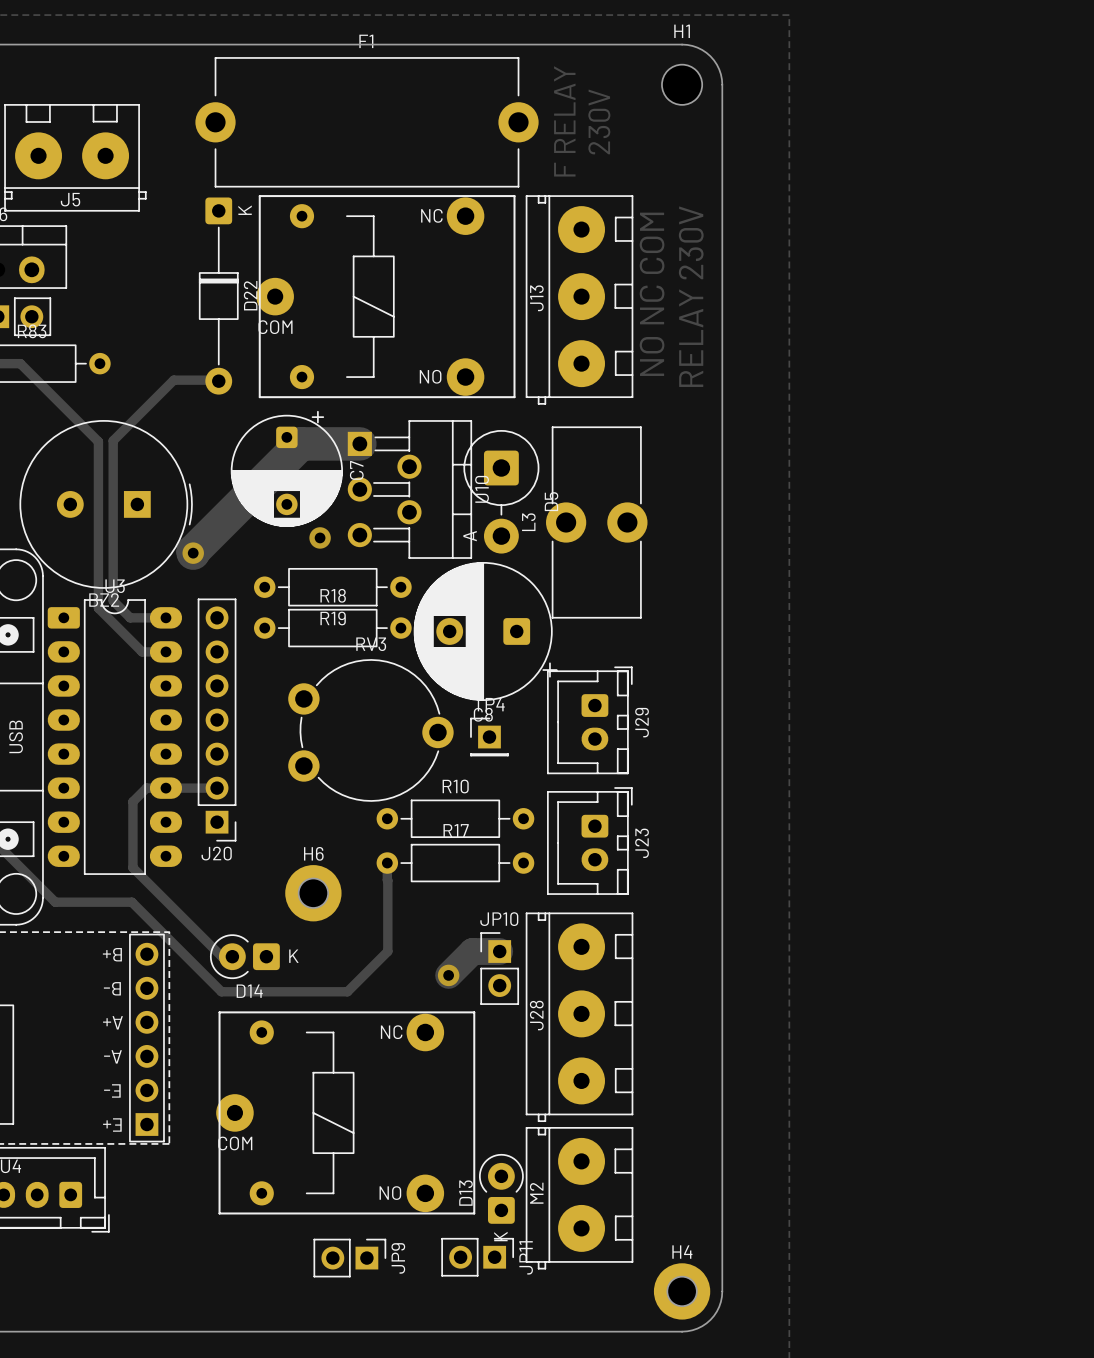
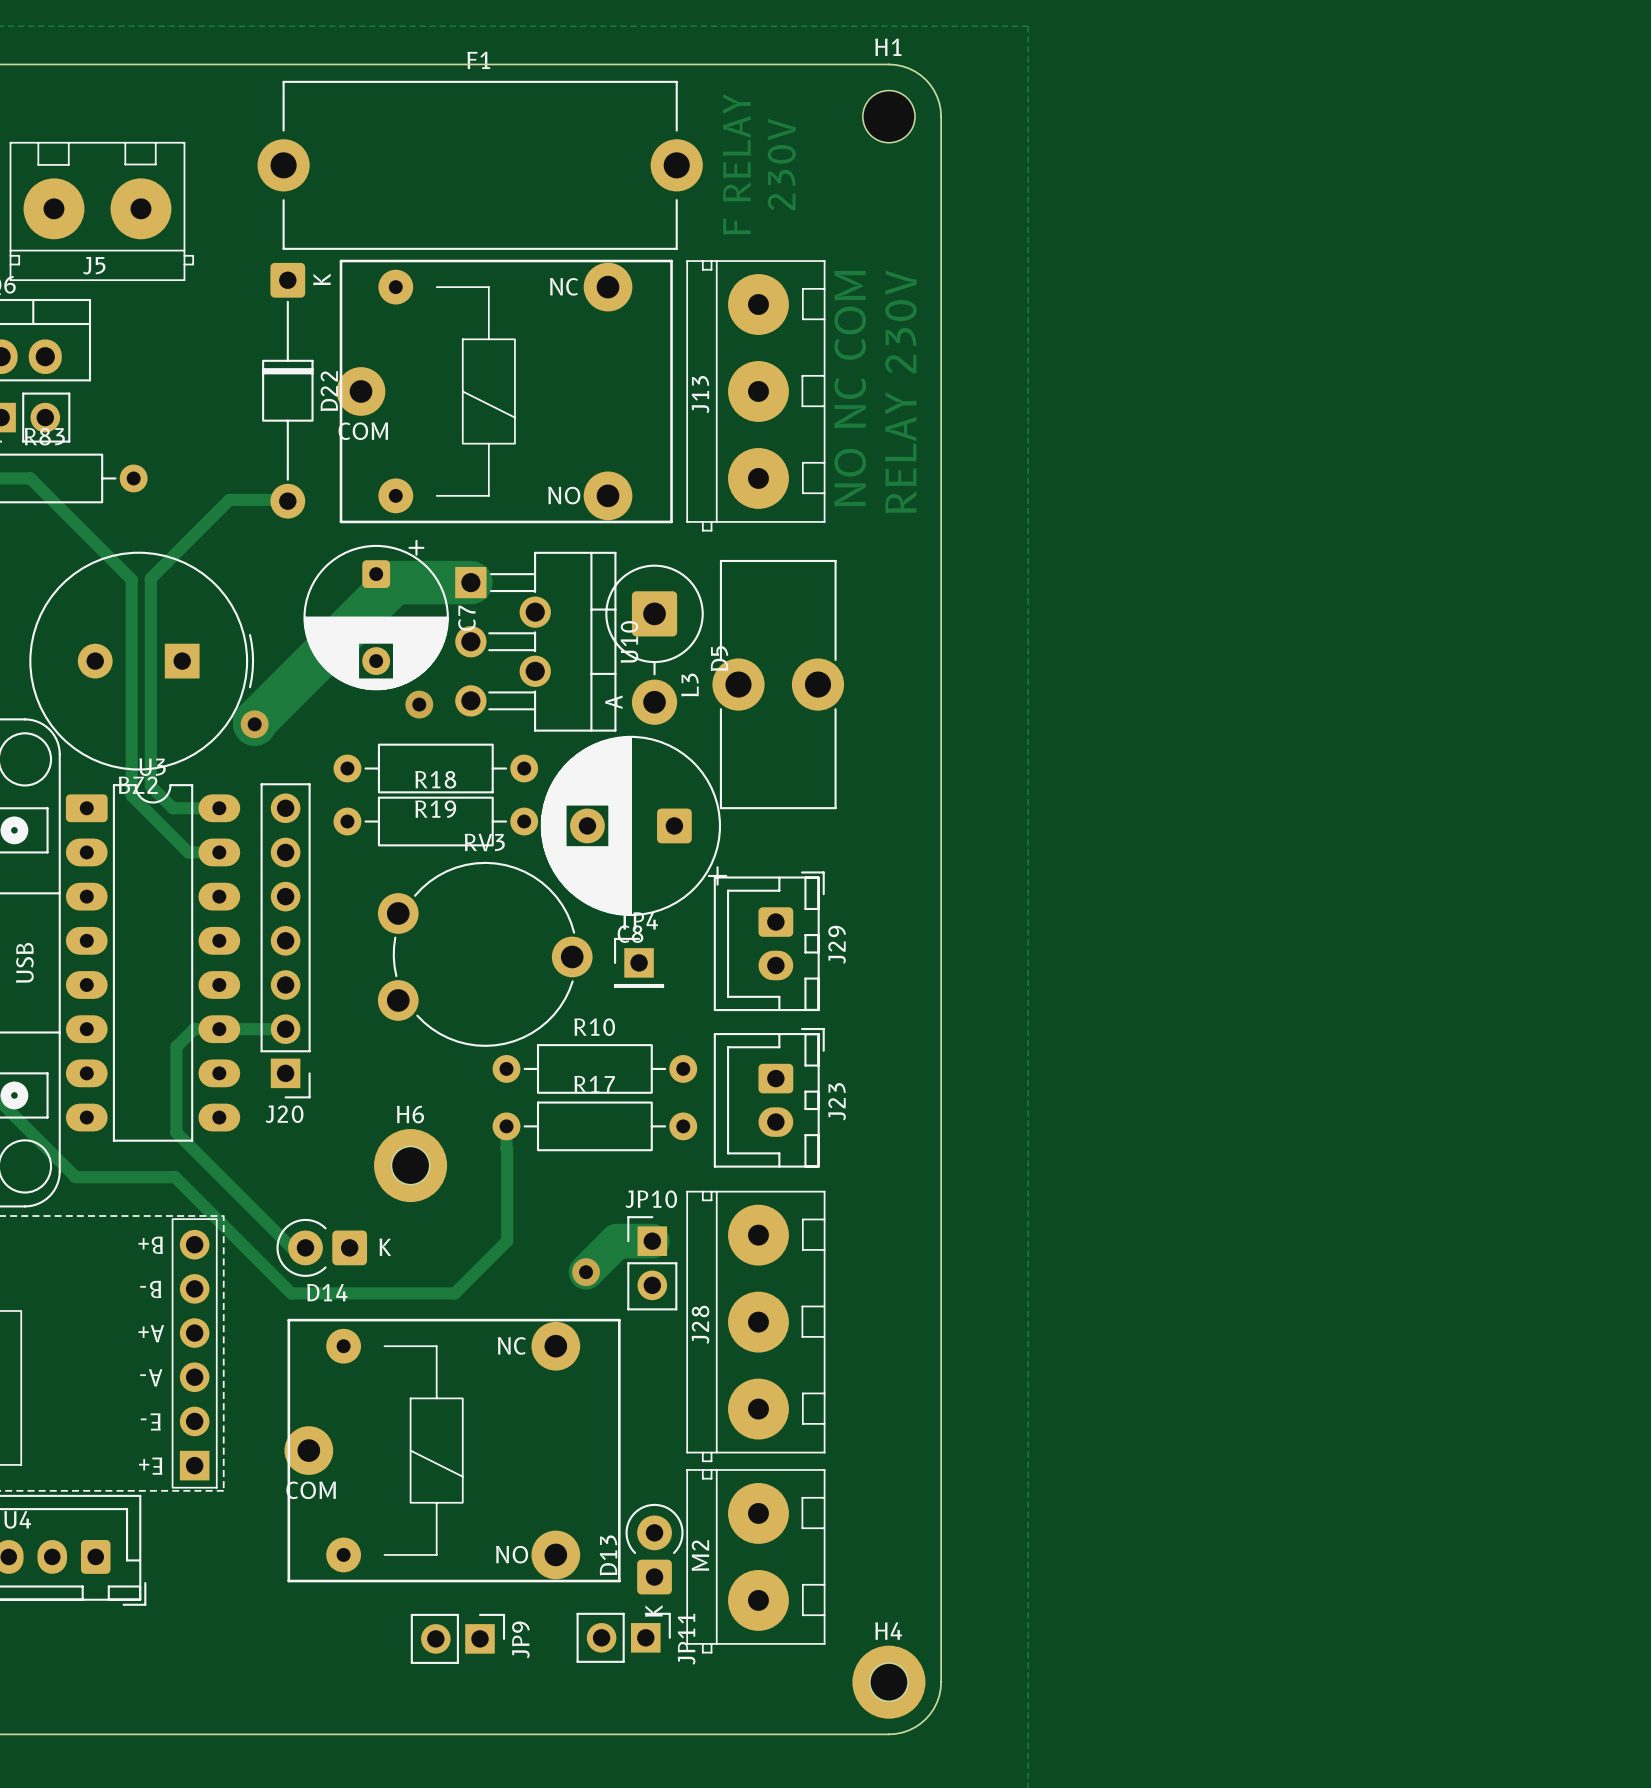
part footprint: [256, 195, 516, 399] -> [336, 259, 673, 524]
part footprint: [216, 1011, 476, 1215] -> [284, 1318, 621, 1583]

